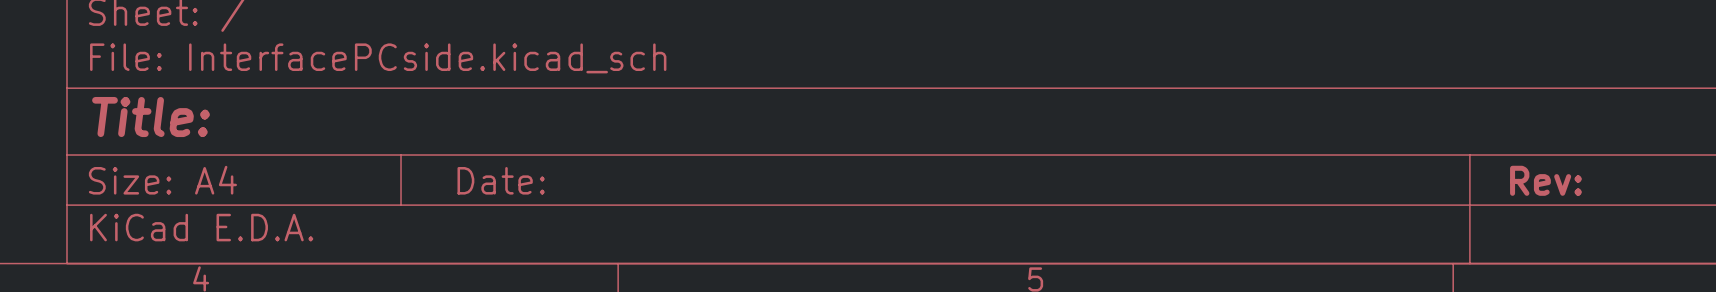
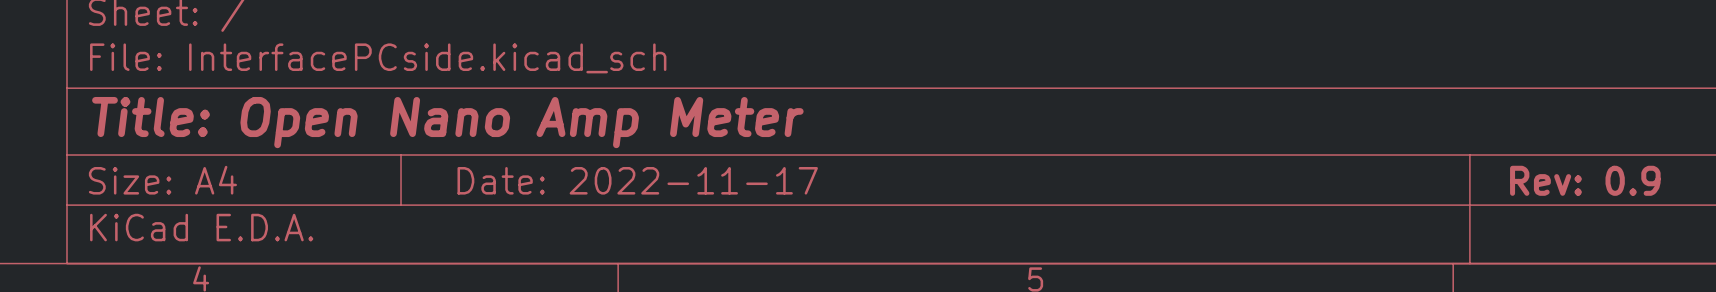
title block: Title: (151, 117) -> Title: Open Nano Amp Meter (447, 122)
title block: Date: (501, 180) -> Date: 2022-11-17 (637, 180)
title block: Rev: (1545, 180) -> Rev: 0.9 (1585, 180)

